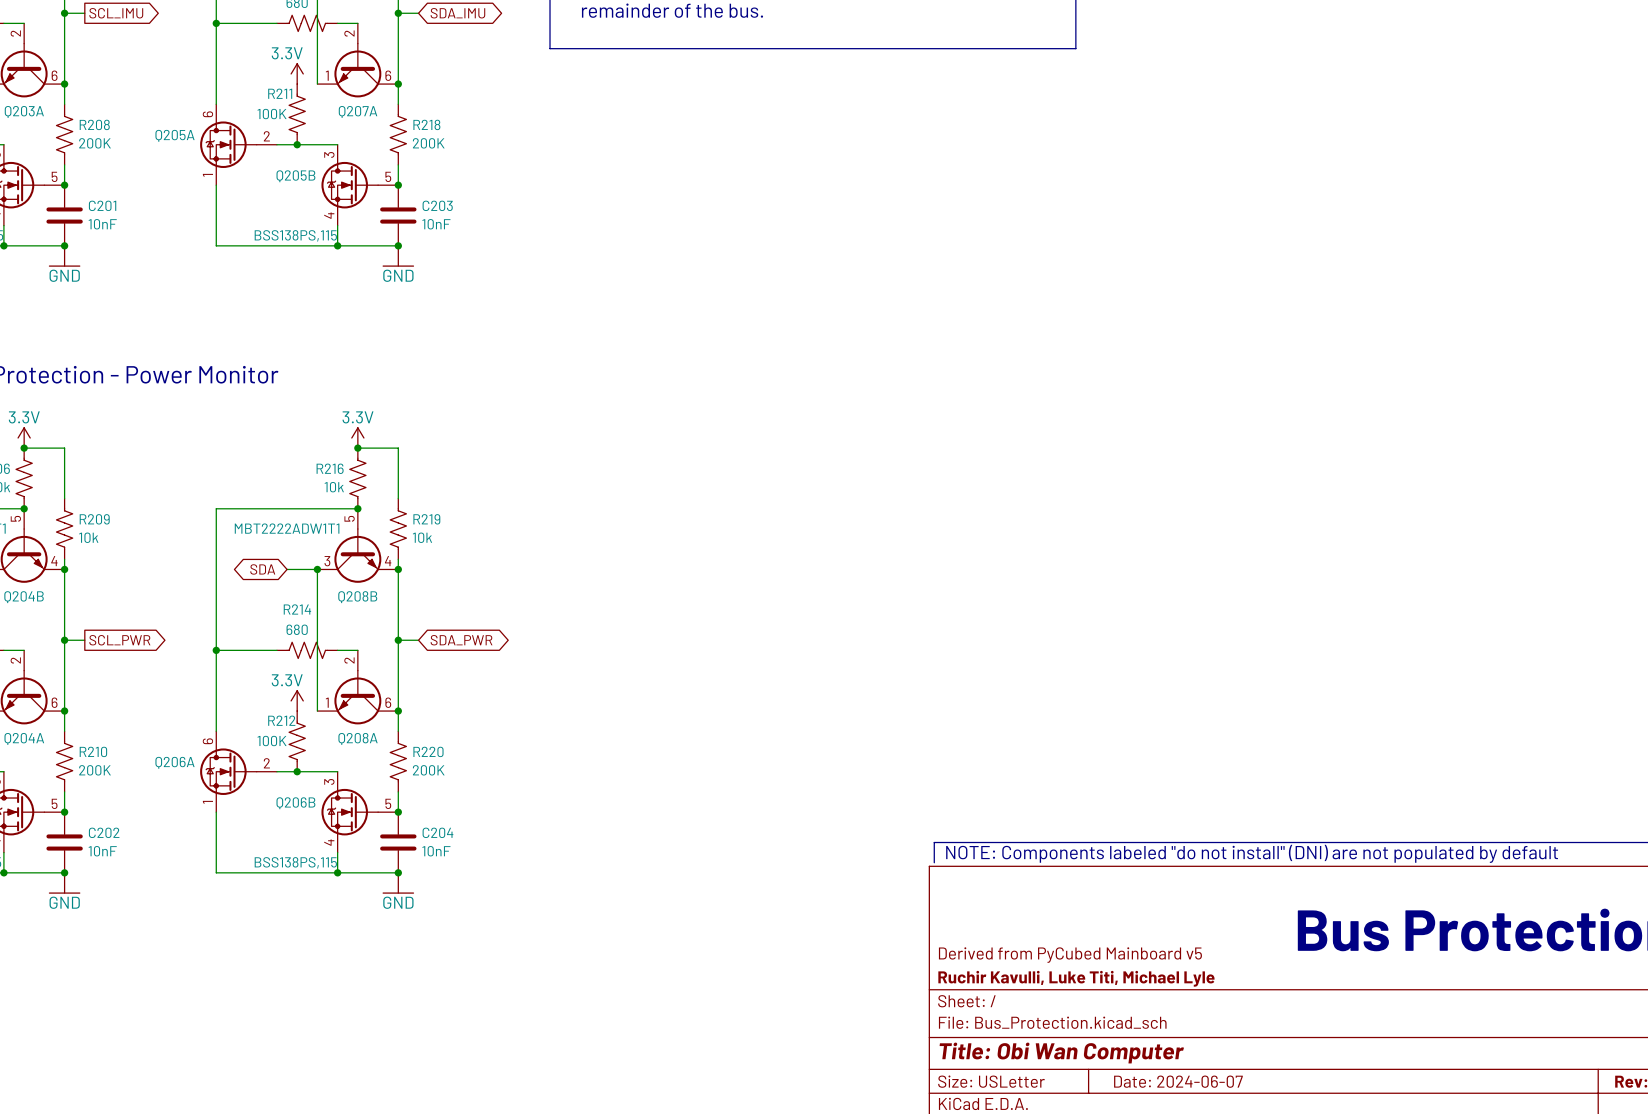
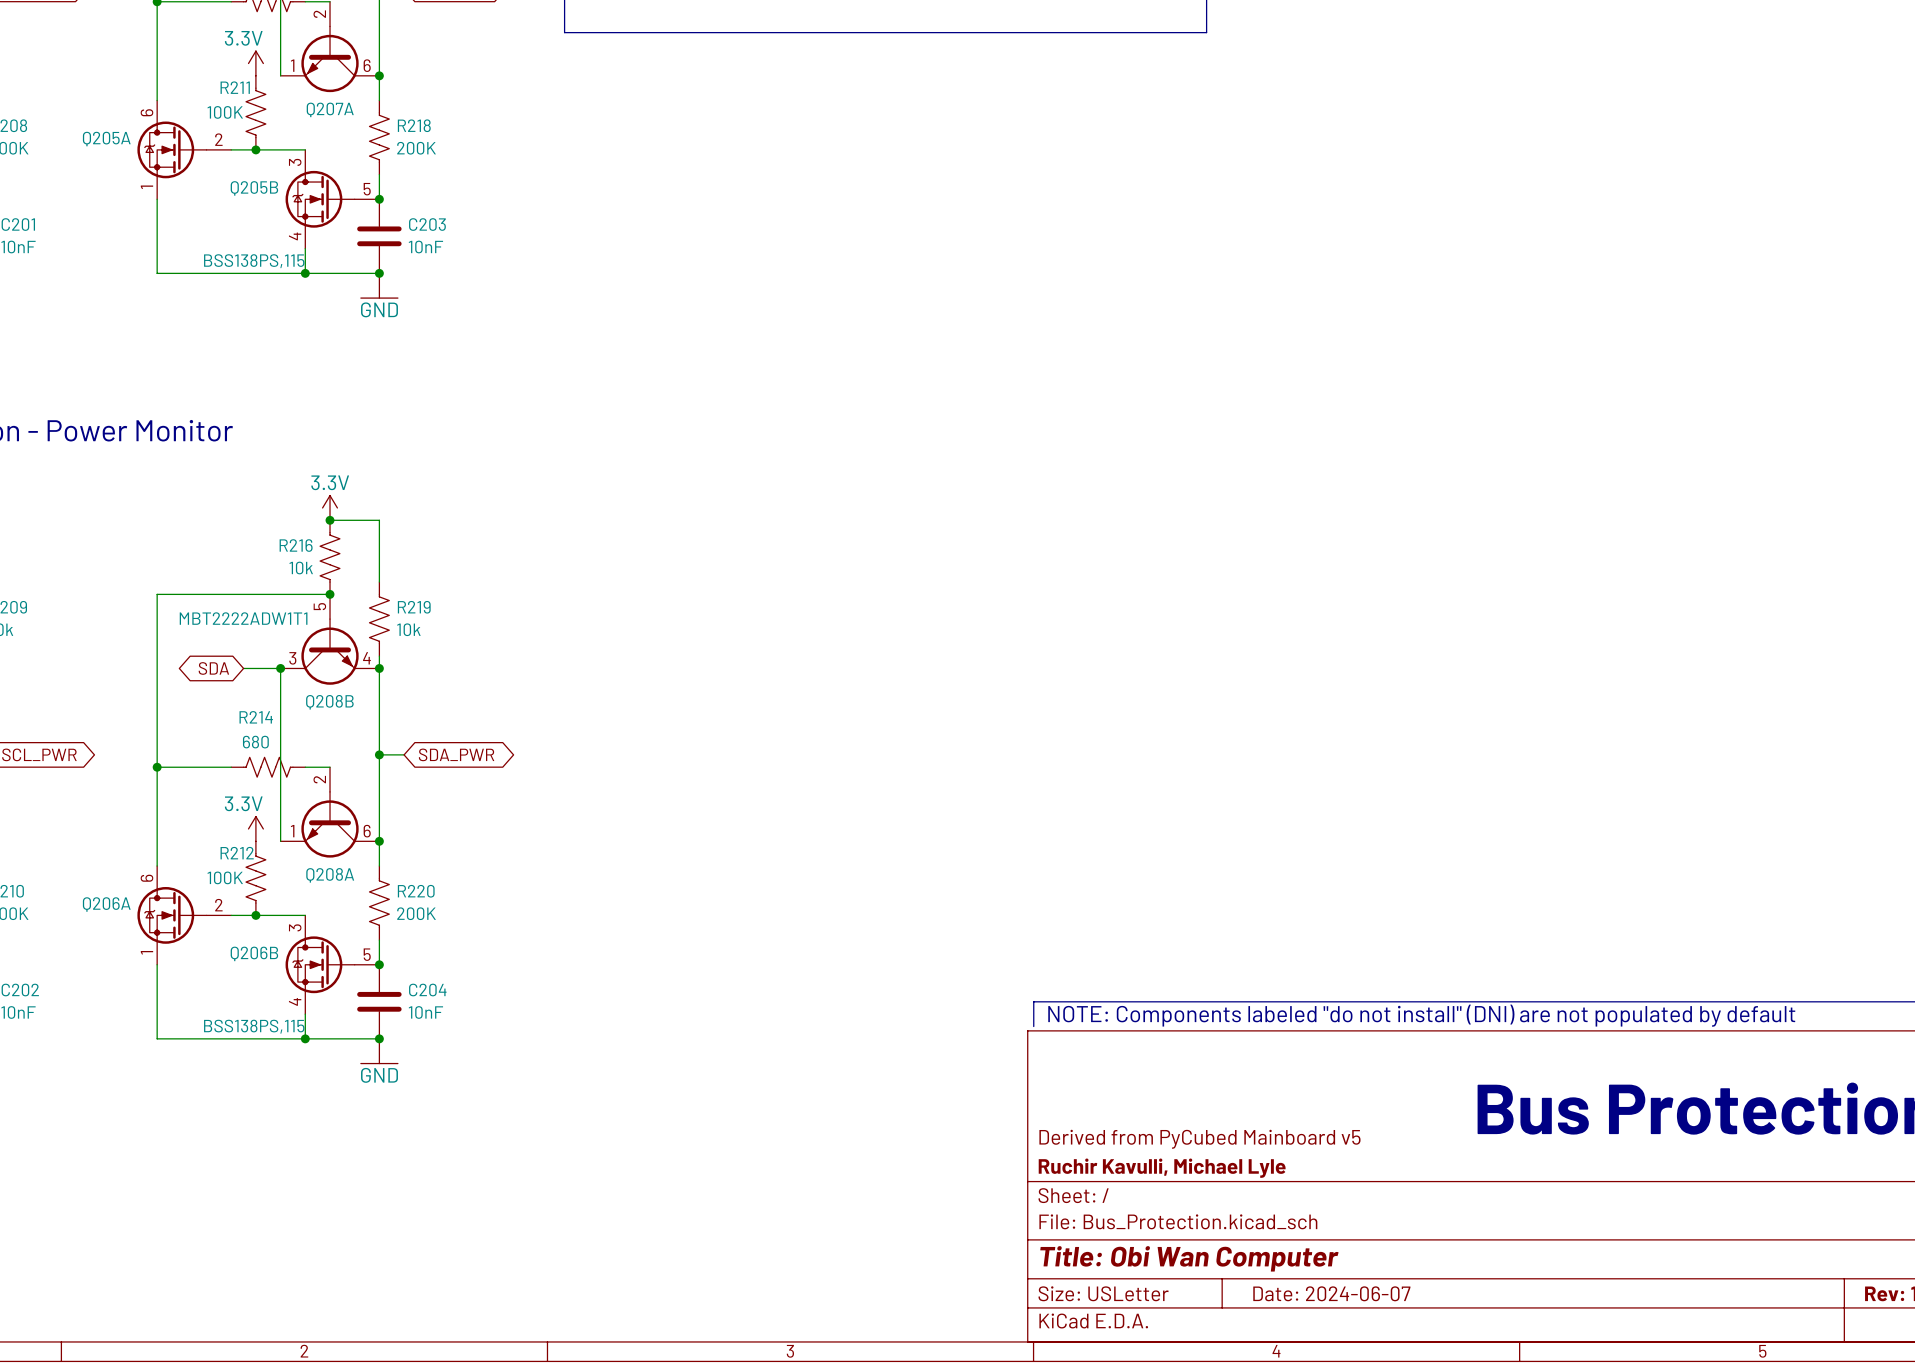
title block: Ruchir Kavulli, Luke Titi, Michael Lyle (1076, 978) -> Ruchir Kavulli, Michael Lyle (1162, 1168)

